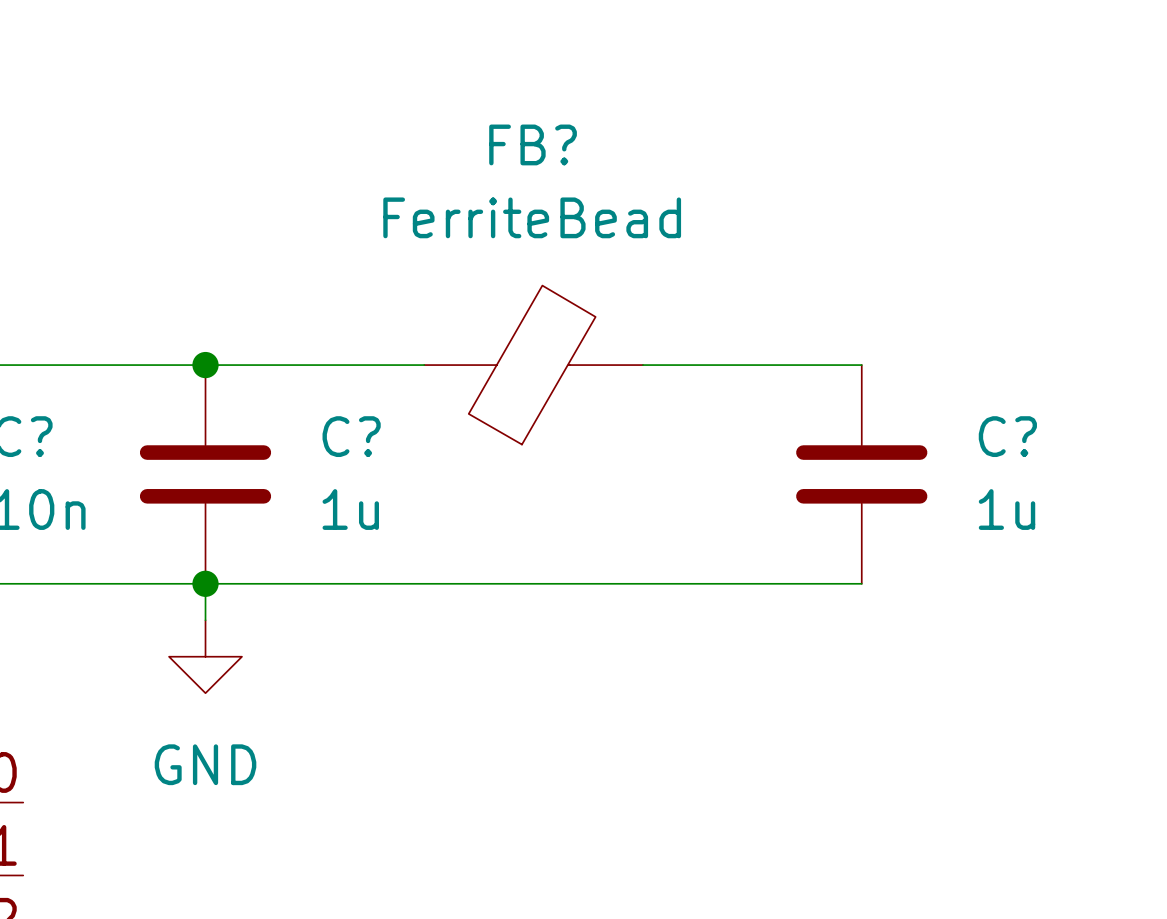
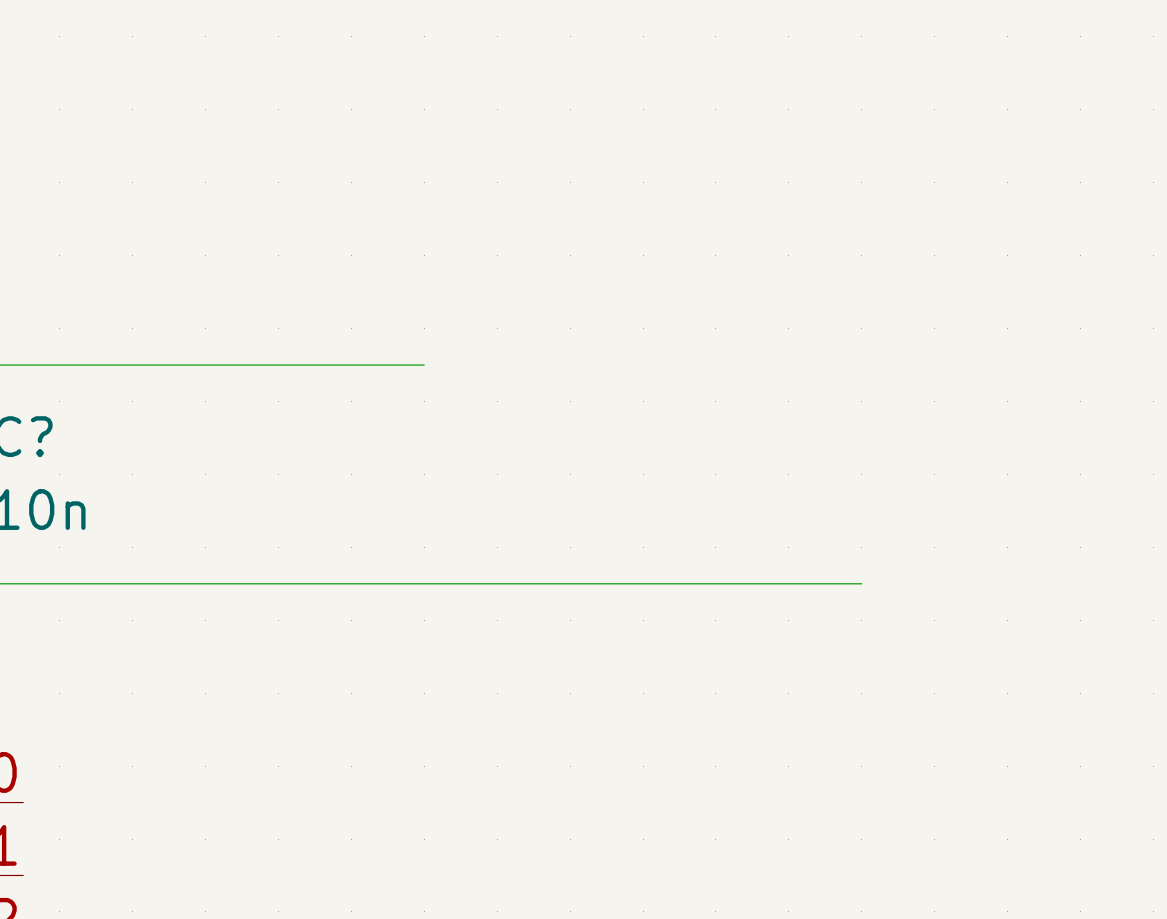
junction: (205, 365) -> none
FB?: FerriteBead (533, 365) -> none
wire: (643, 365) (861, 365) -> none
C?: 1u (205, 474) -> none
C?: 1u (861, 474) -> none
wire: (205, 583) (205, 620) -> none
junction: (205, 583) -> none
power symbol: GND (205, 656) -> none

